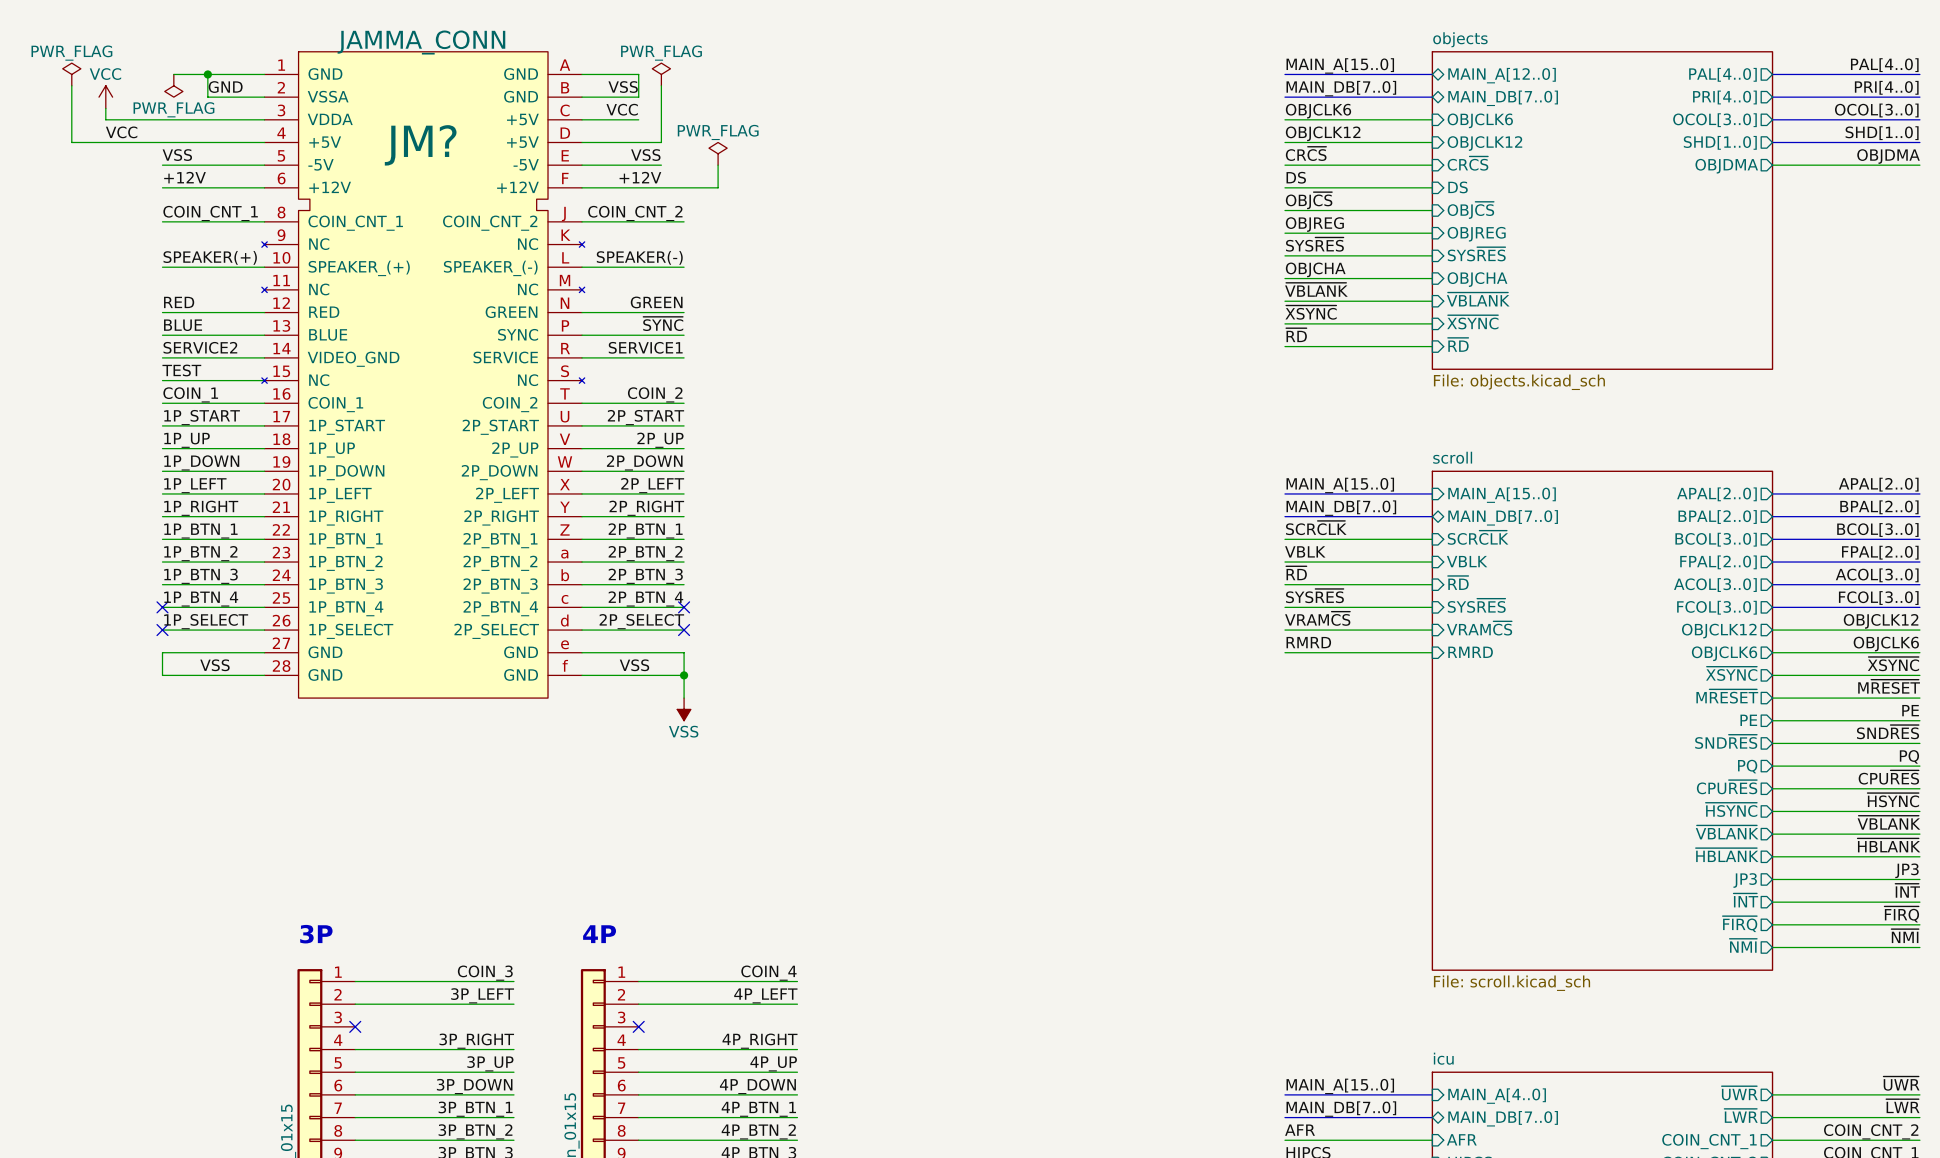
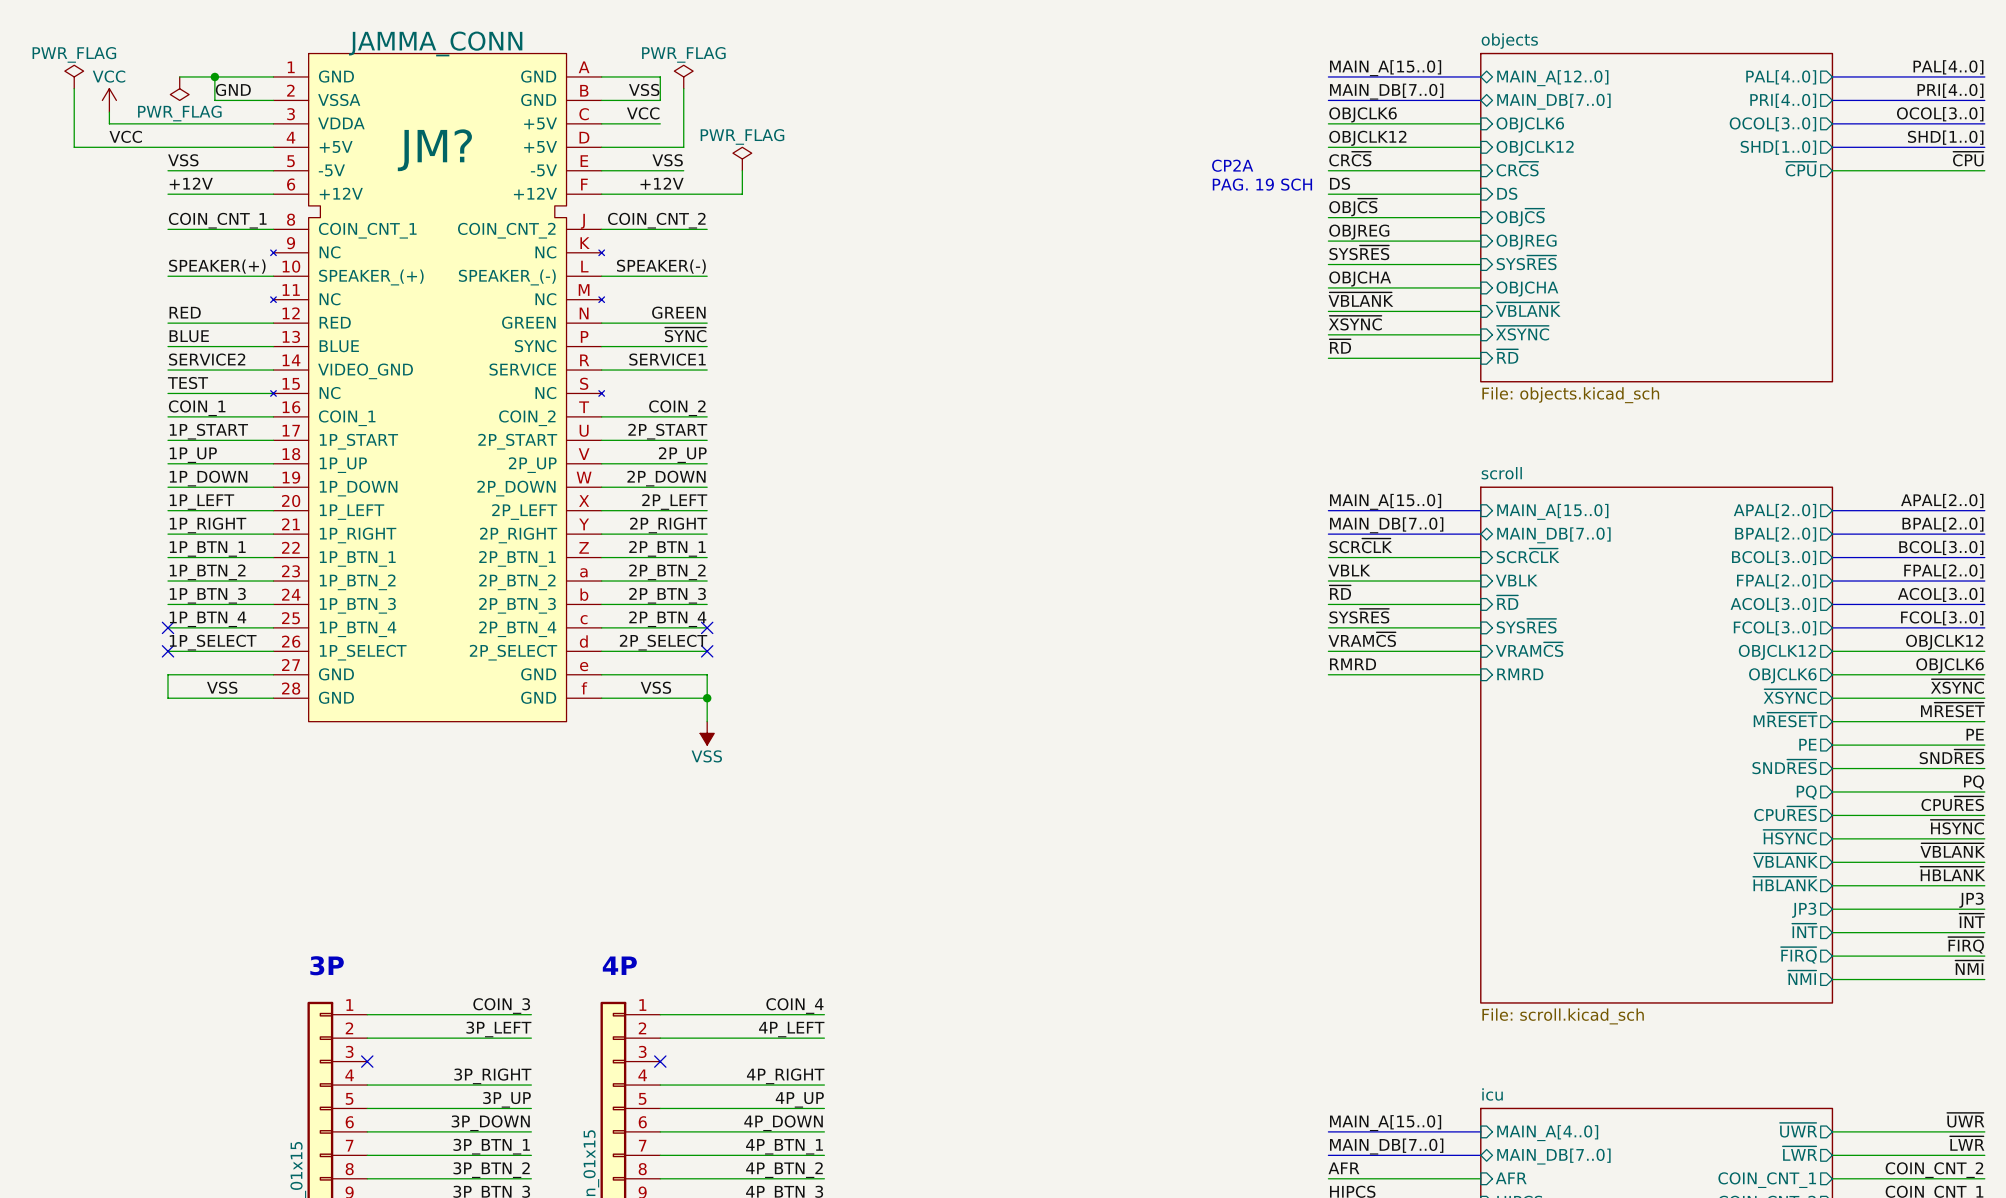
label: OBJDMA (1888, 156) -> ~{CPU} (1968, 159)
text: none -> CP2A (1232, 165)
sheet pin: OBJDMA (1726, 166) -> ~{CPU} (1801, 169)
text: none -> PAG. 19 SCH (1262, 184)

